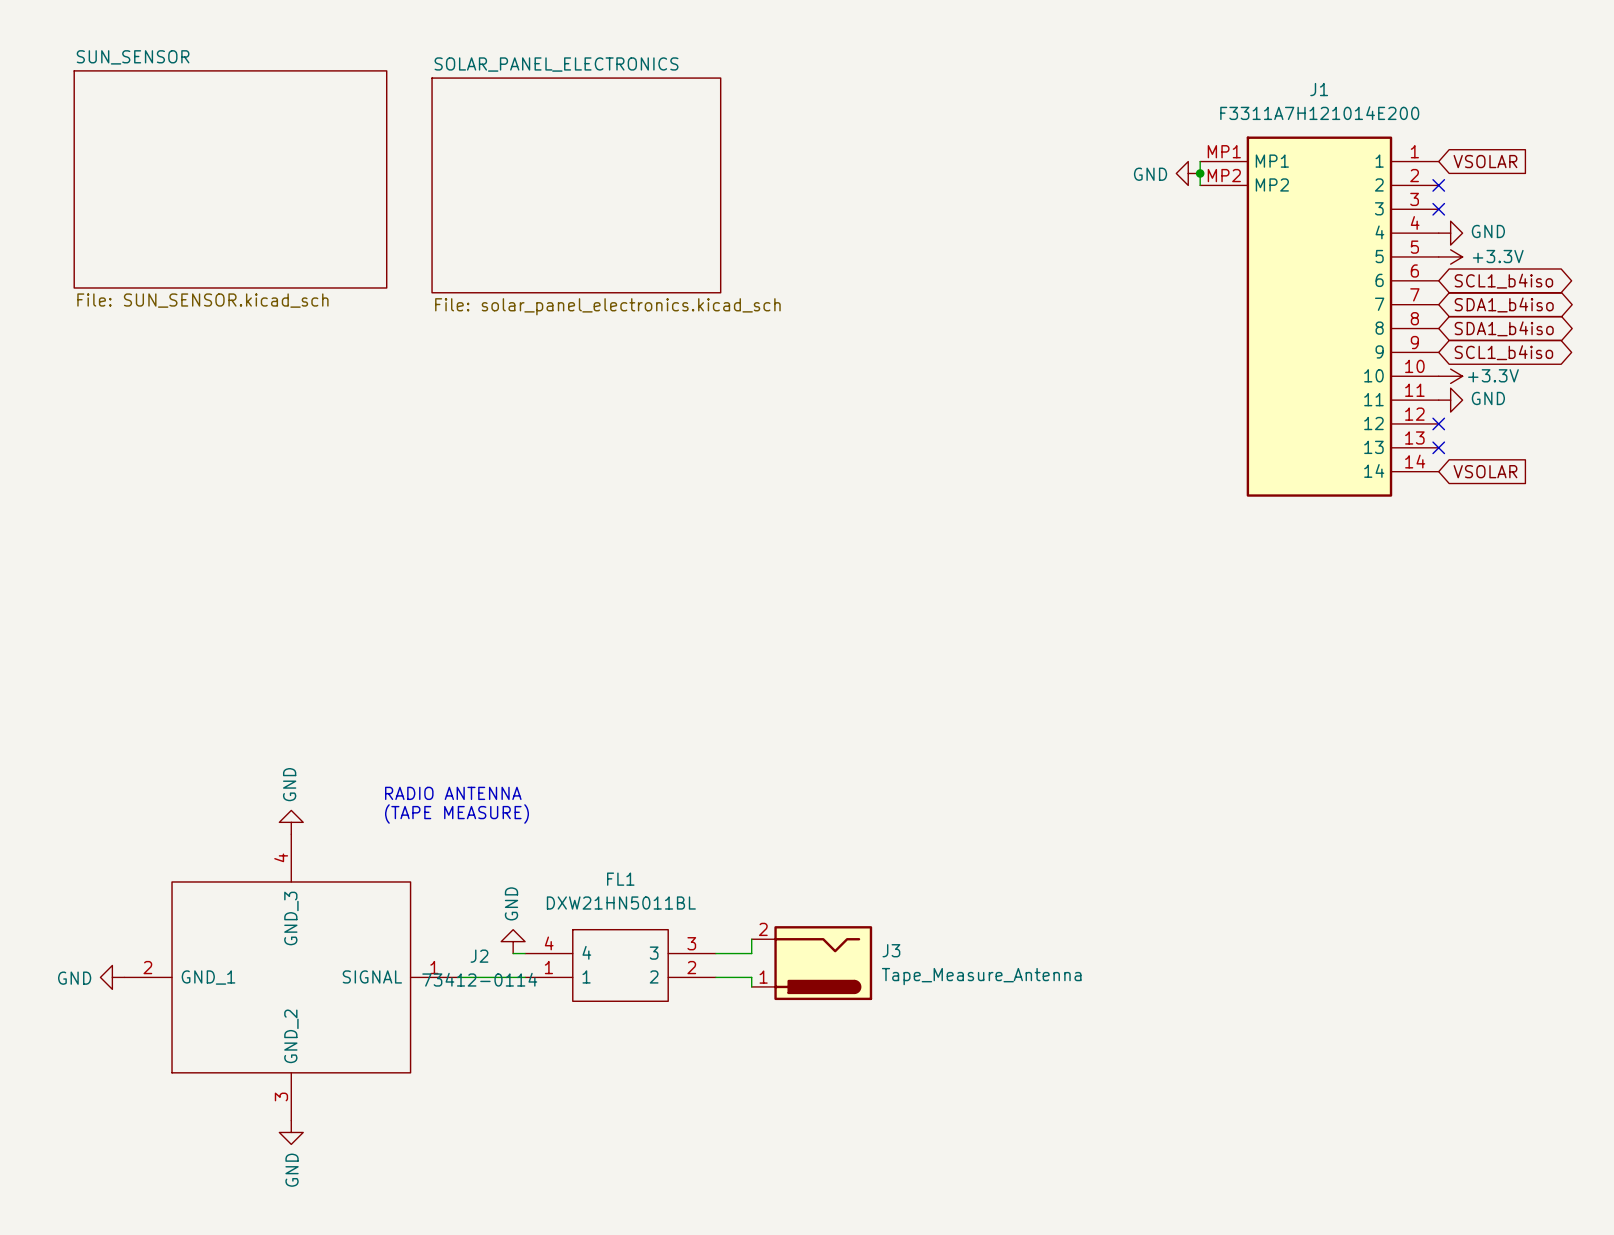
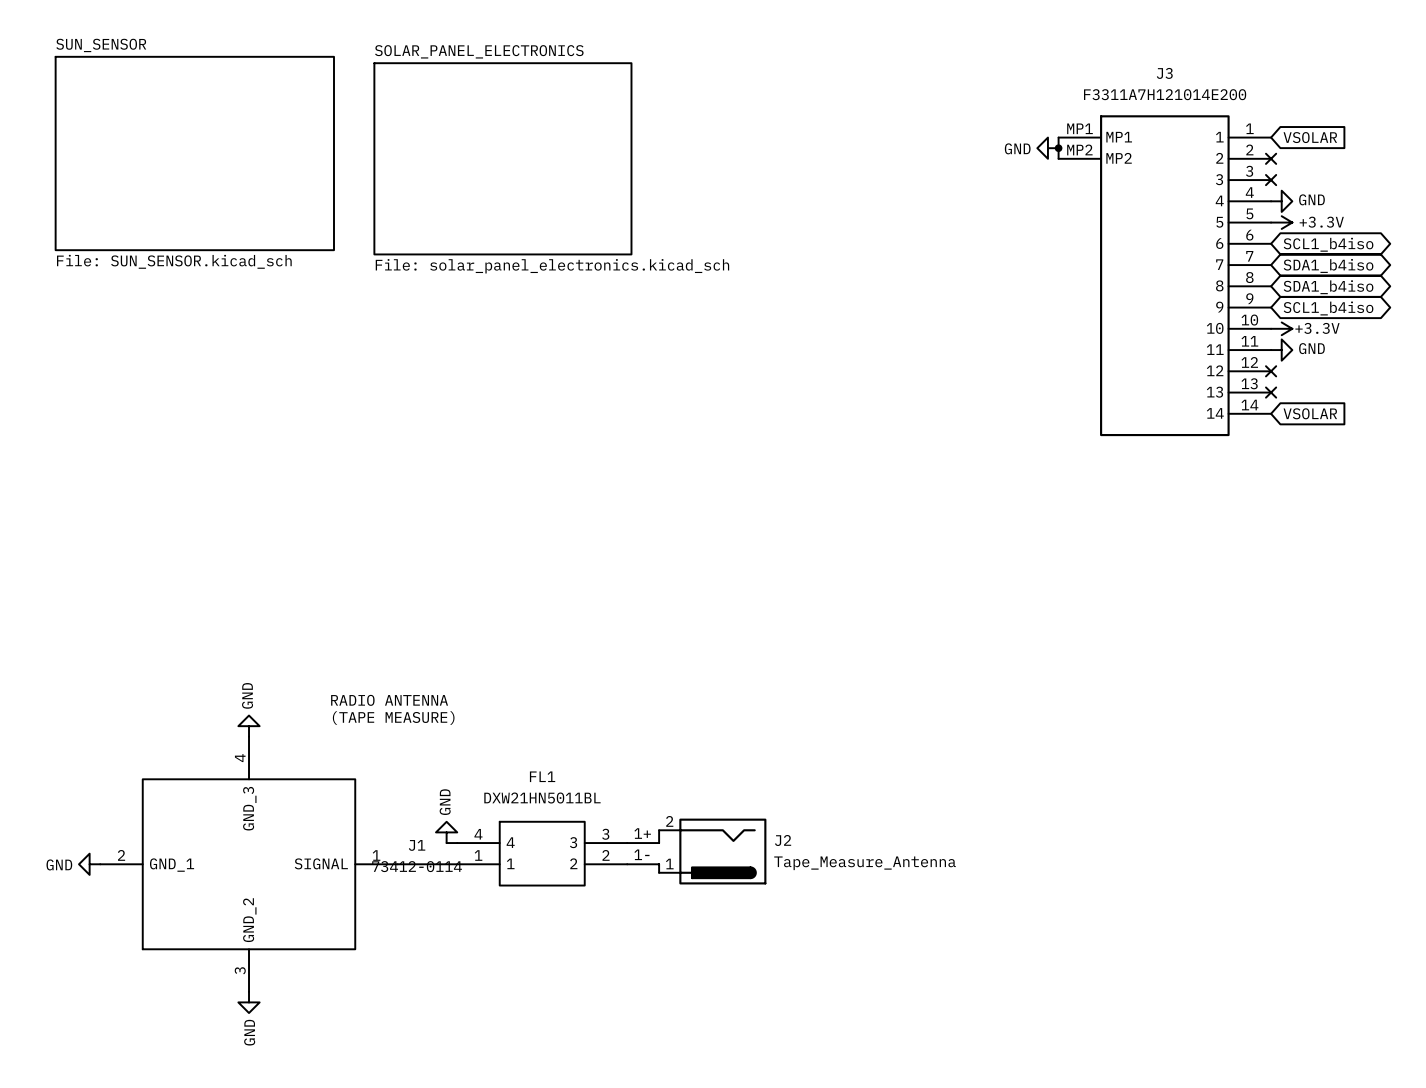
J1 name: J1 (1319, 89) -> J3 (1164, 73)
label: none -> 1+ (642, 833)
J3 name: J3 (891, 950) -> J2 (783, 840)
J2 name: J2 (479, 956) -> J1 (417, 845)
label: none -> 1- (641, 854)

